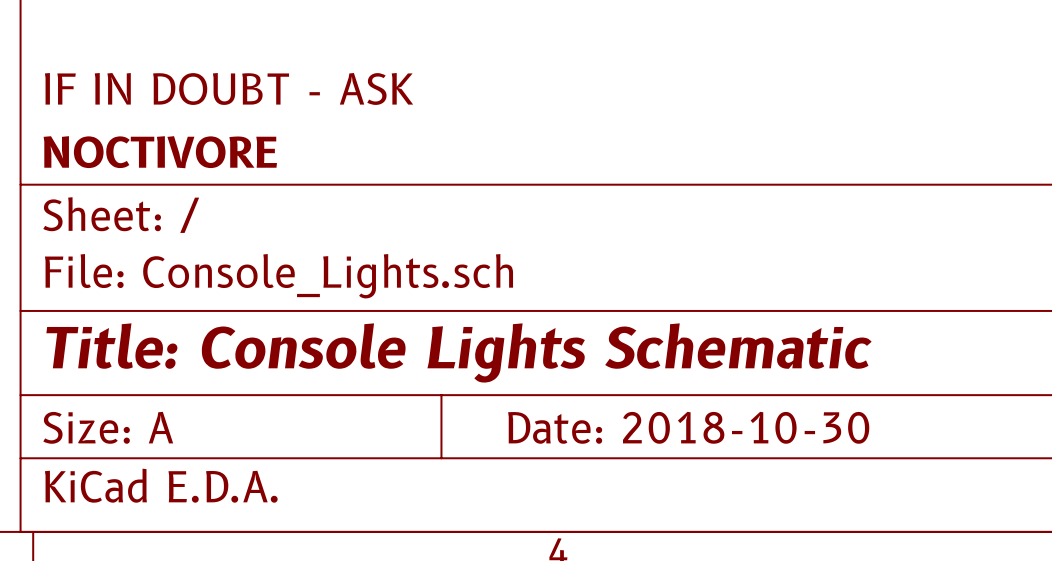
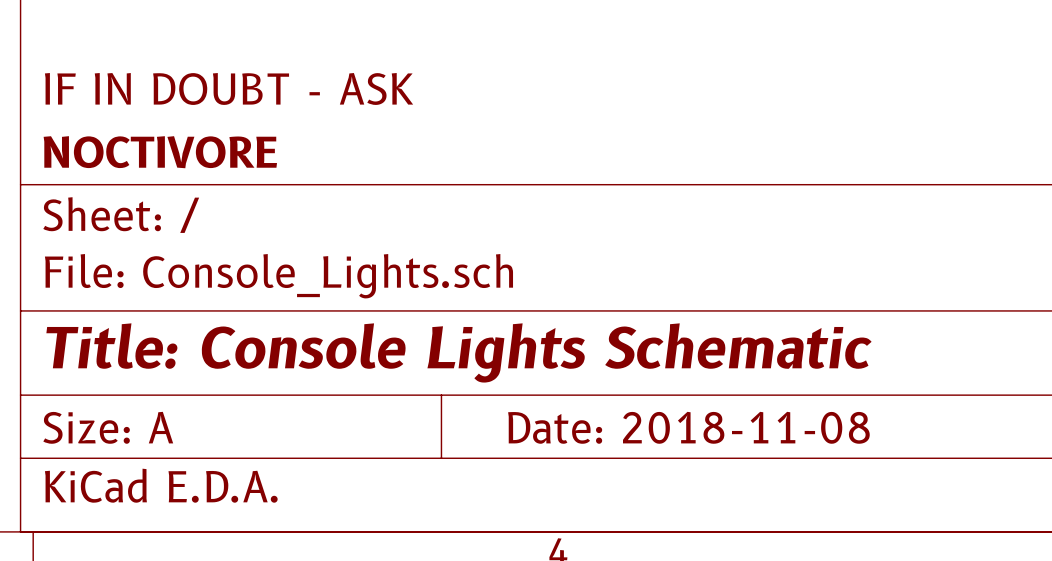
title block: Date: 2018-10-30 (688, 427) -> Date: 2018-11-08 (688, 427)

